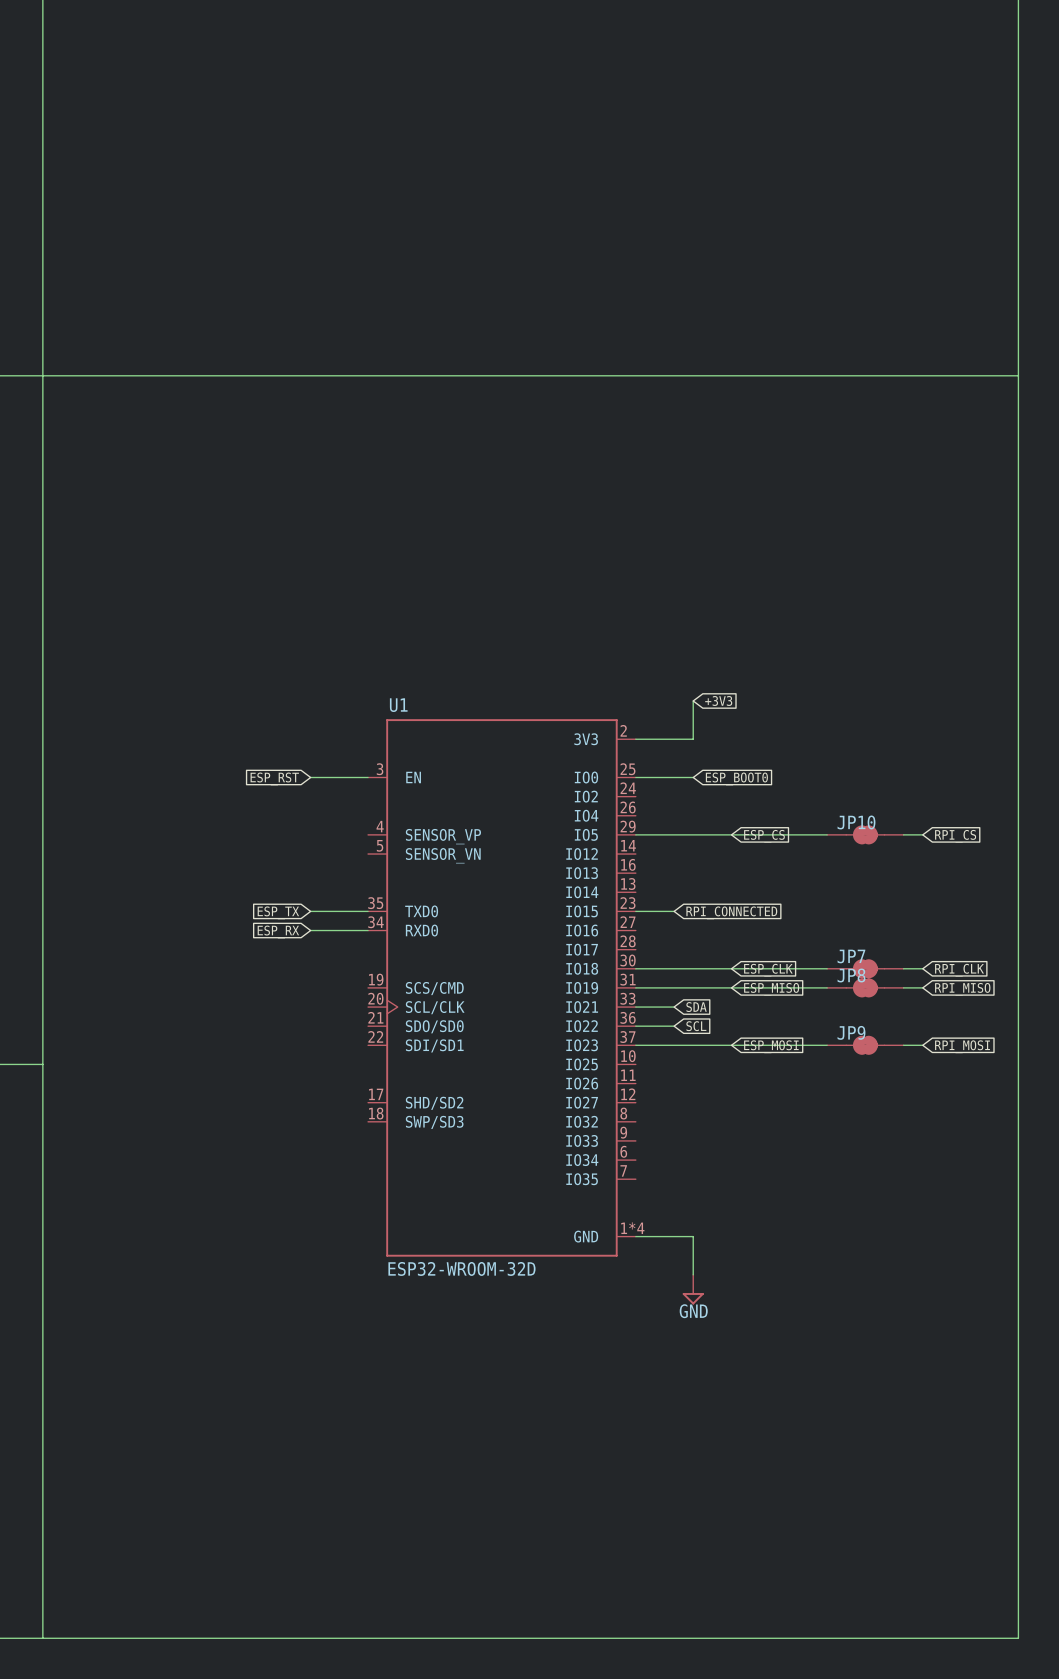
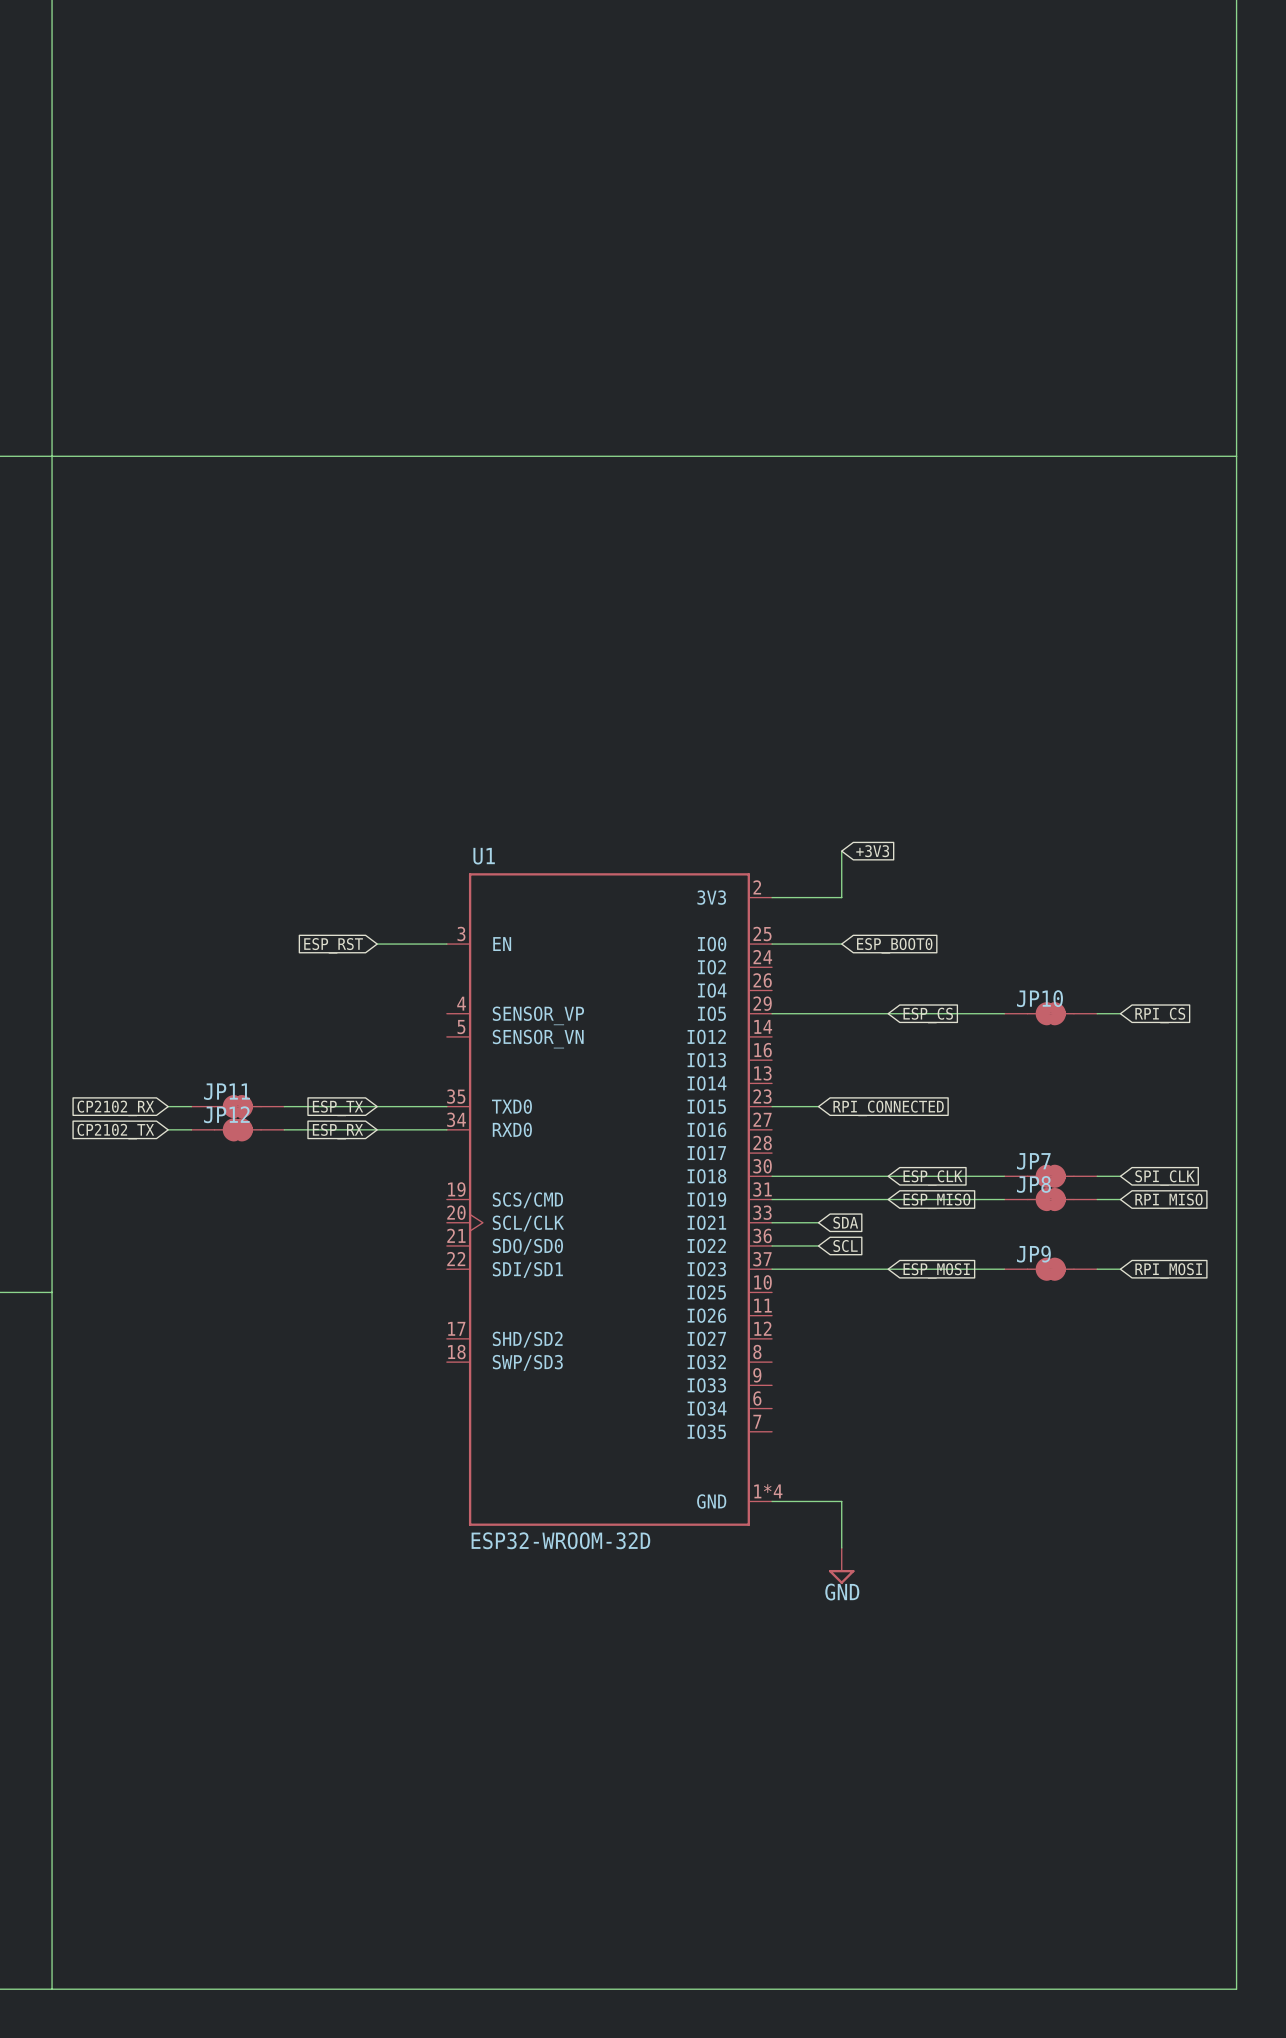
wire: none -> (168, 1106) (191, 1106)
JP11: none -> (237, 1106)
wire: none -> (284, 1106) (377, 1106)
global label: none -> CP2102_RX (115, 1108)
wire: none -> (168, 1129) (191, 1129)
JP12: none -> (237, 1129)
wire: none -> (284, 1129) (377, 1129)
global label: none -> CP2102_TX (115, 1131)
global label: RPI_CLK (959, 970) -> SPI_CLK (1165, 1178)

